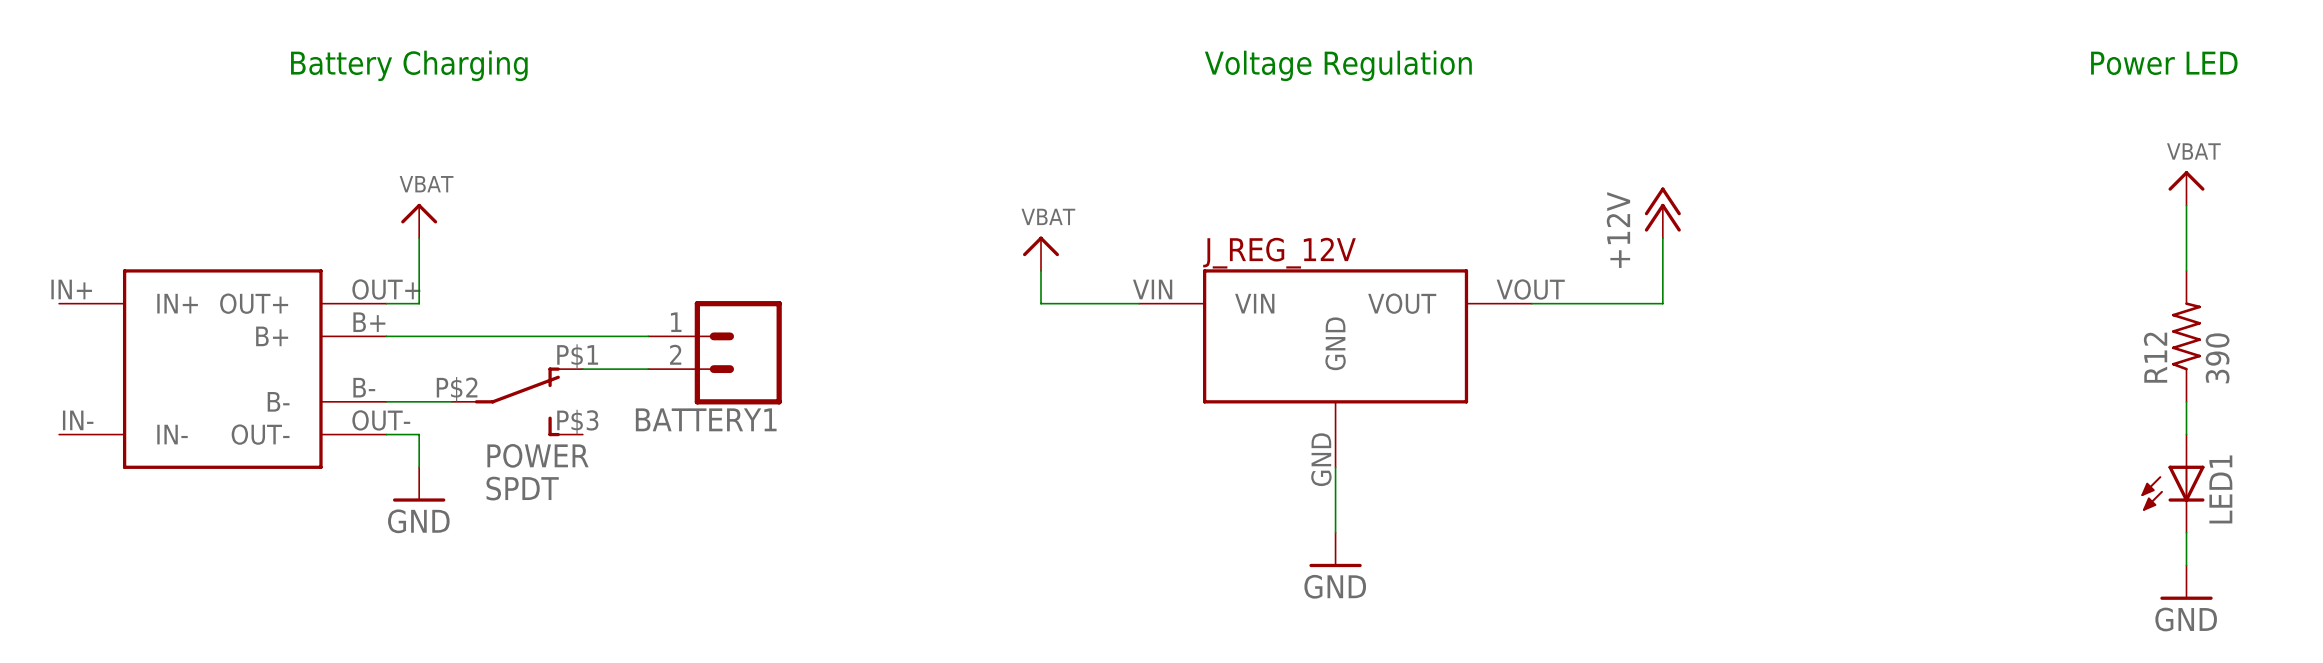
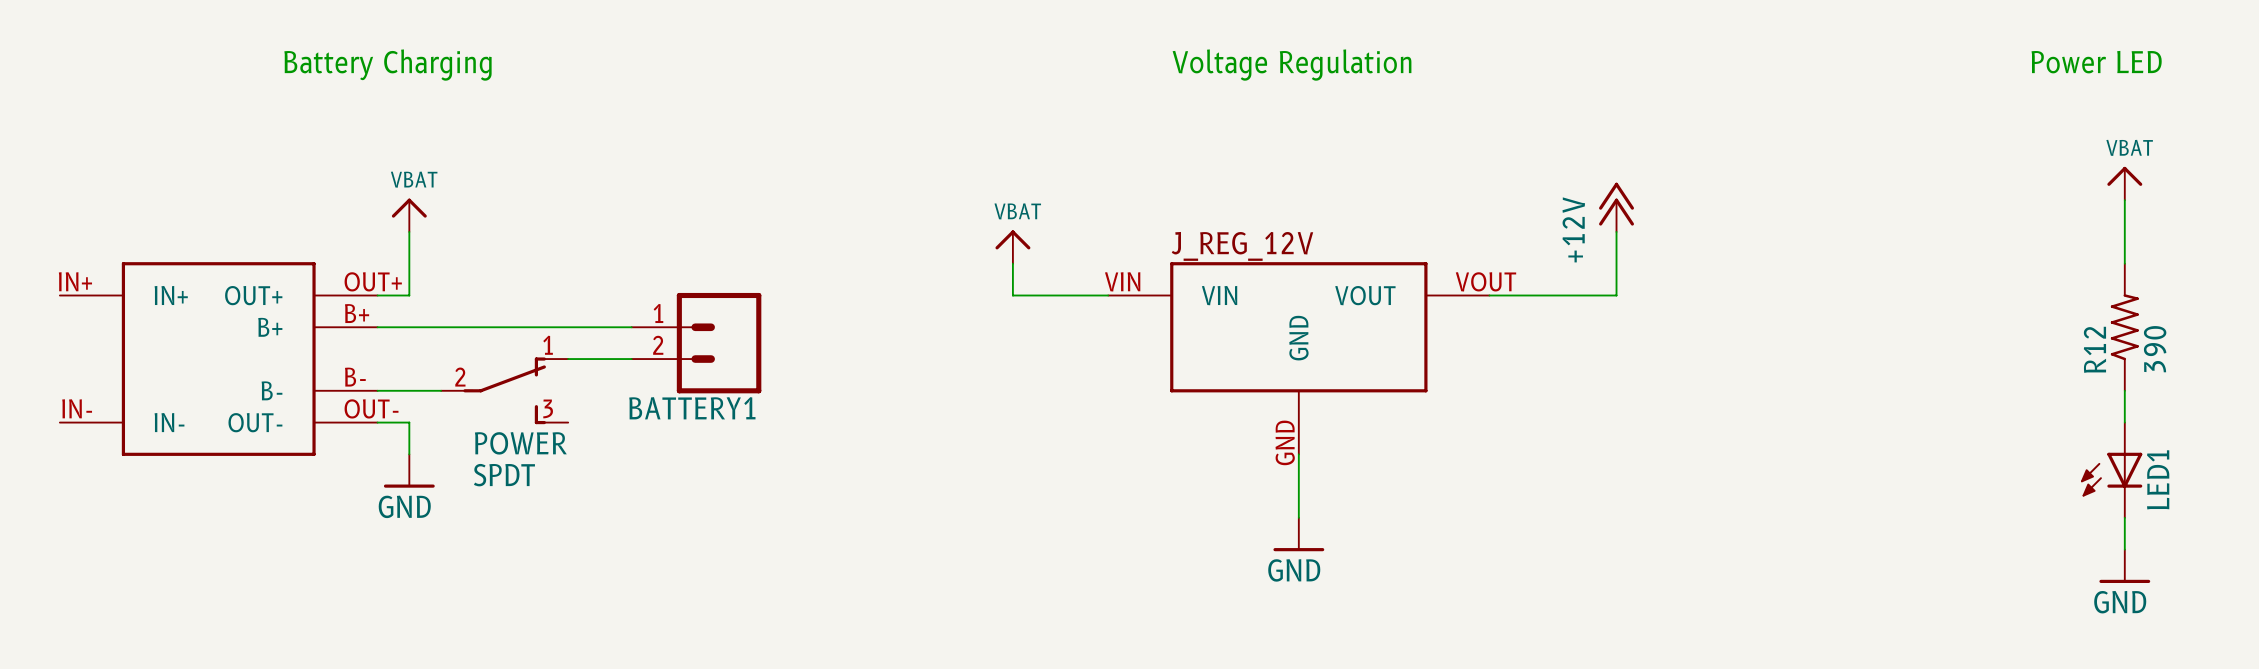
POWER pin number: P$1 (577, 356) -> 1 (548, 345)
POWER pin number: P$2 (457, 389) -> 2 (460, 377)
POWER pin number: P$3 (577, 421) -> 3 (548, 408)

